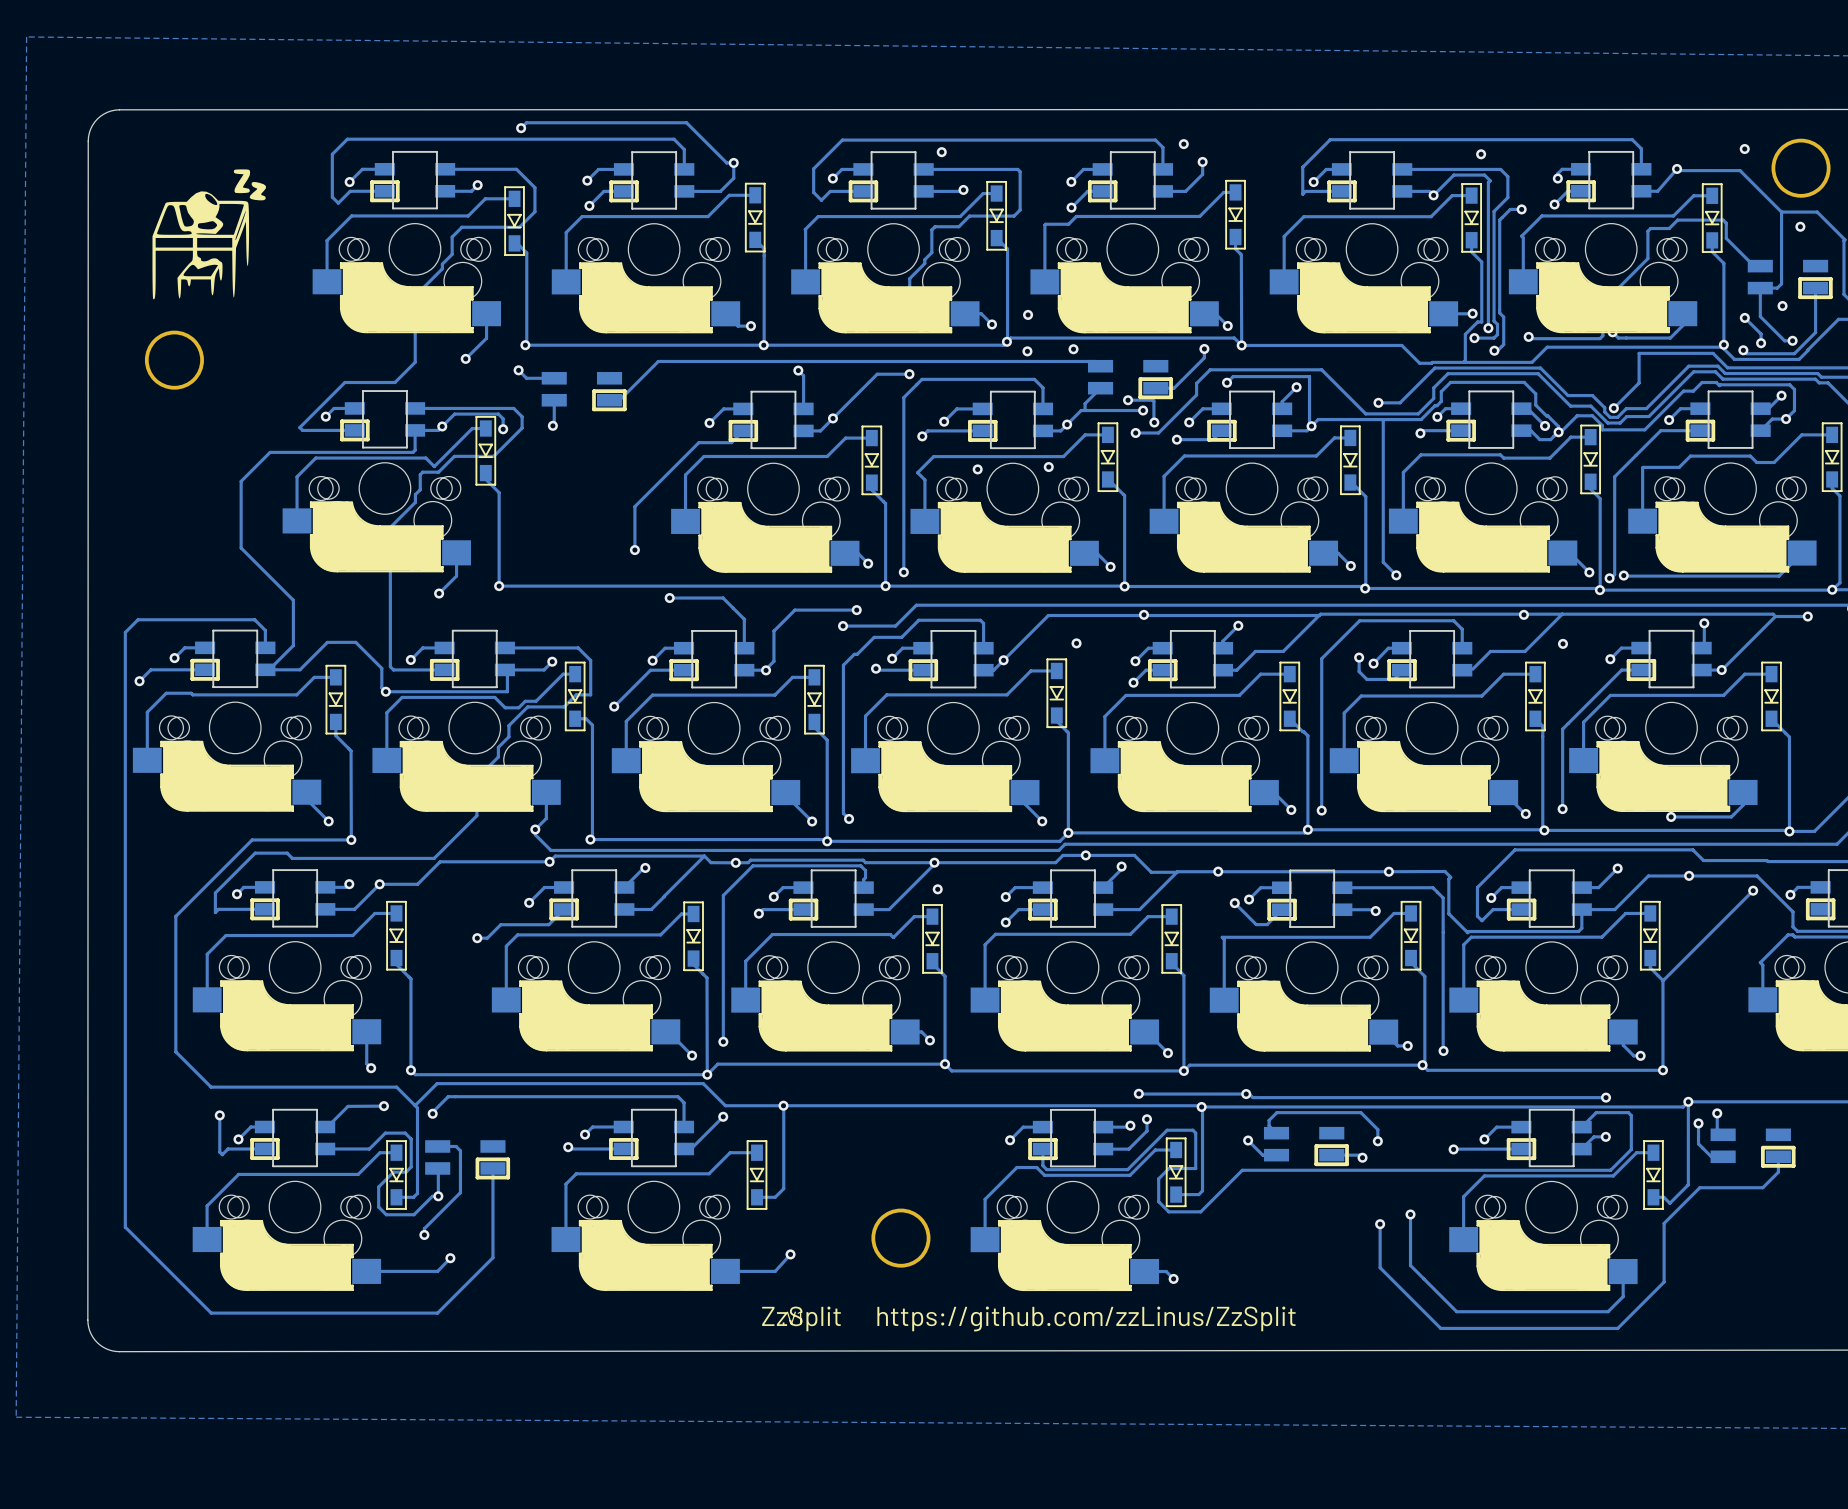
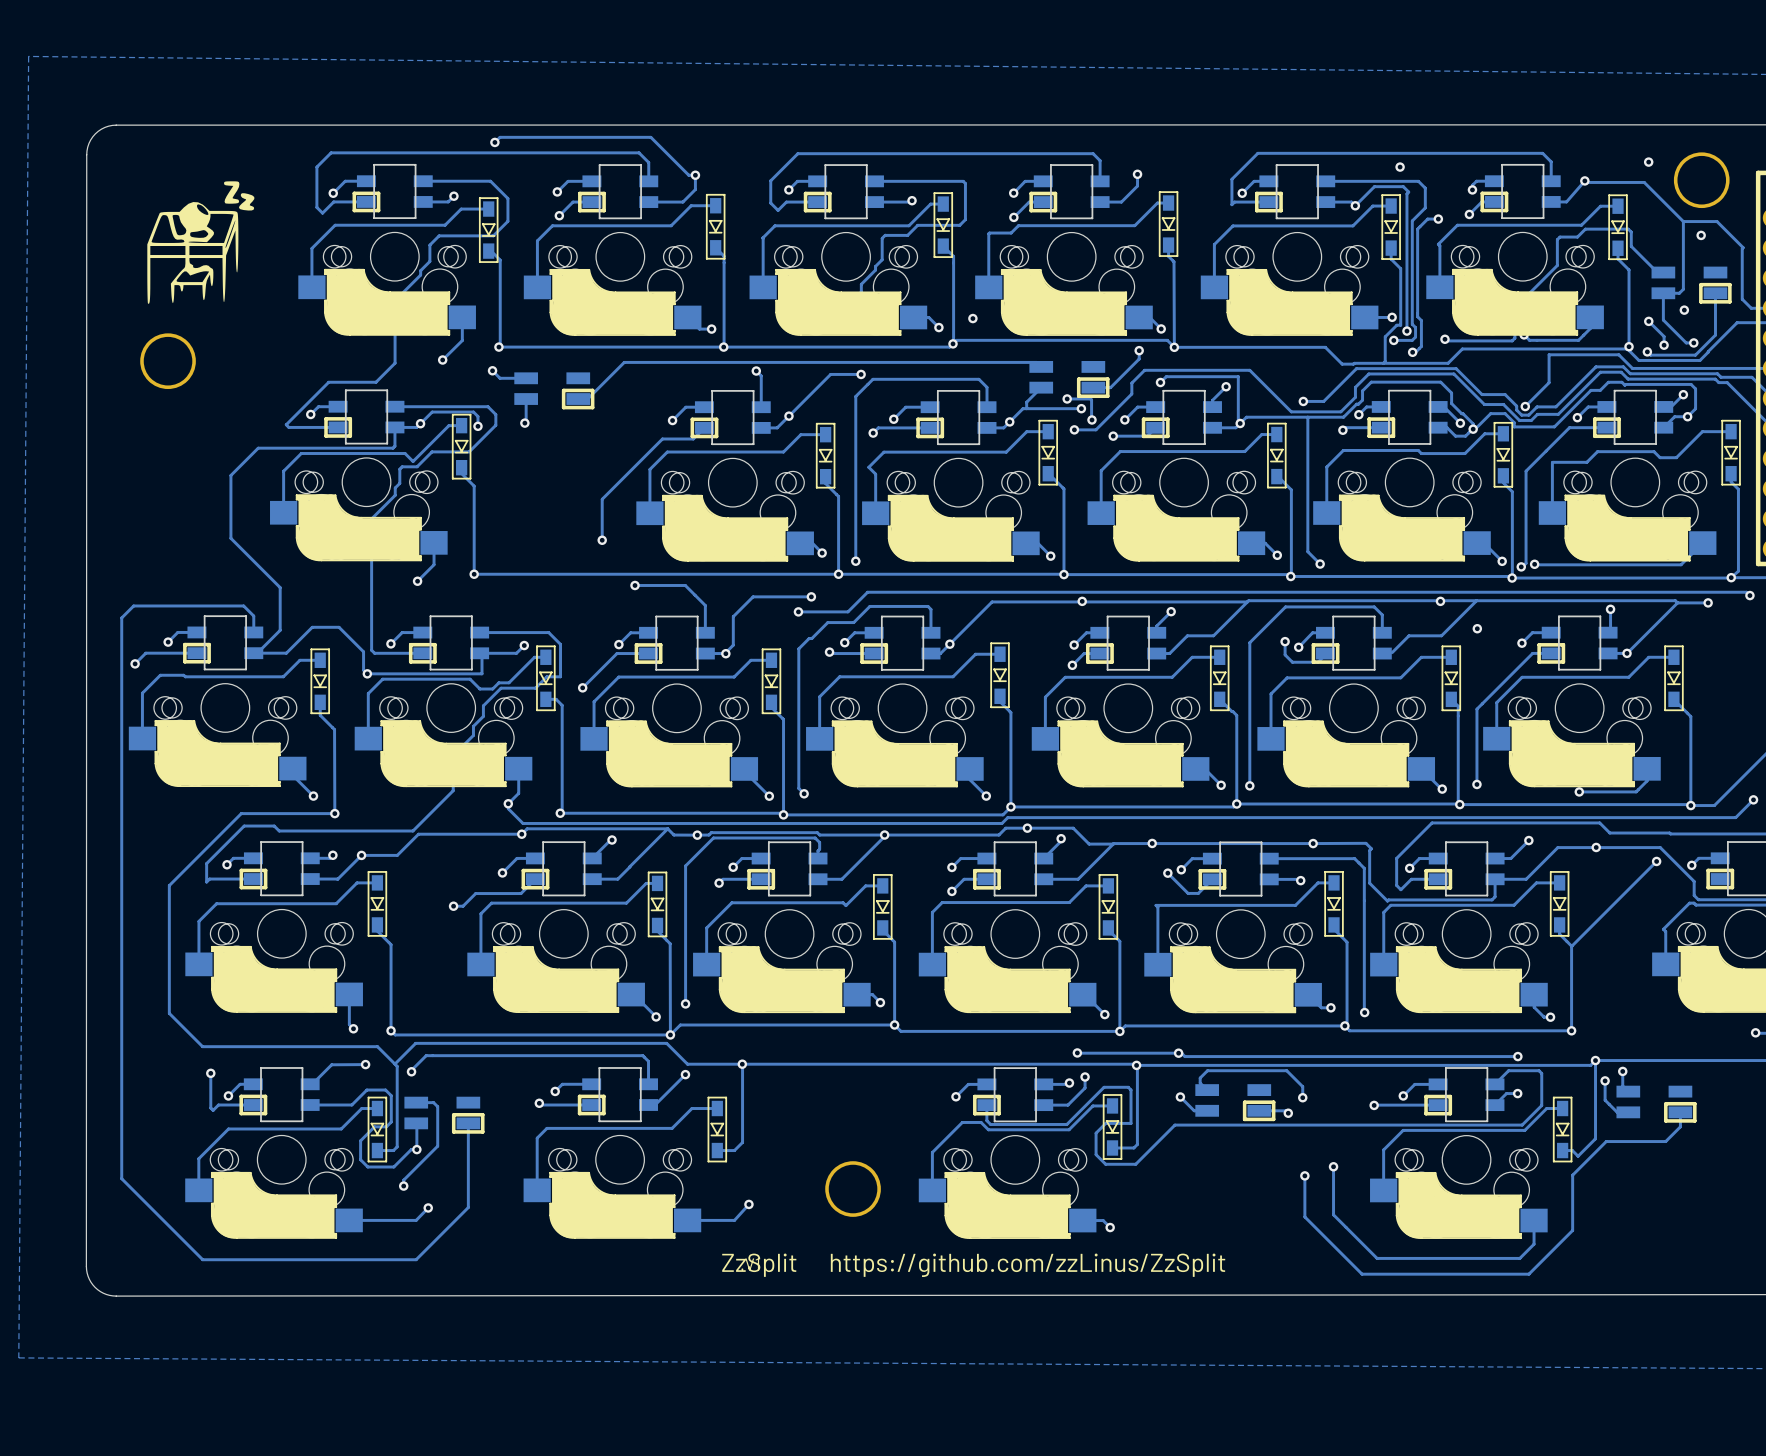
via: (1183, 144) -> none
via: (941, 152) -> none
via: (1073, 349) -> none
via: (1027, 351) -> none
via: (1048, 467) -> none
via: (977, 469) -> none
via: (1076, 643) -> none
via: (937, 889) -> none

